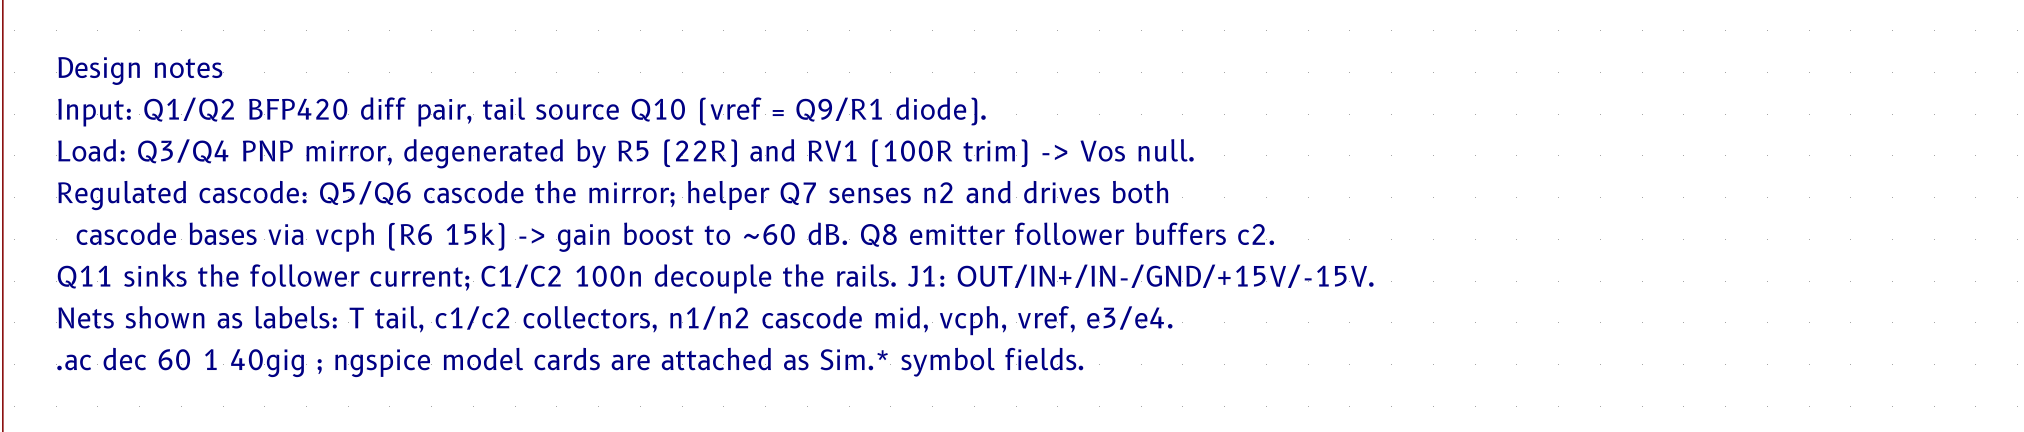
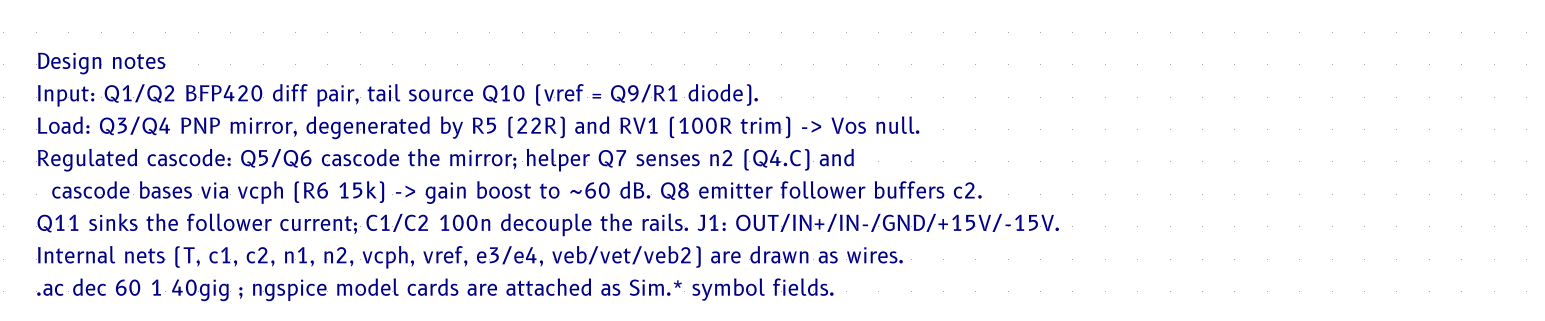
text: Regulated cascode: Q5/Q6 cascode the mirror; helper Q7 senses n2 and drives both (613, 195) -> Regulated cascode: Q5/Q6 cascode the mirror; helper Q7 senses n2 (Q4.C) and (445, 160)
text: Nets shown as labels: T tail, c1/c2 collectors, n1/n2 cascode mid, vcph, vref, e3/e4. (615, 320) -> Internal nets (T, c1, c2, n1, n2, vcph, vref, e3/e4, veb/vet/veb2) are drawn as wires. (470, 257)

